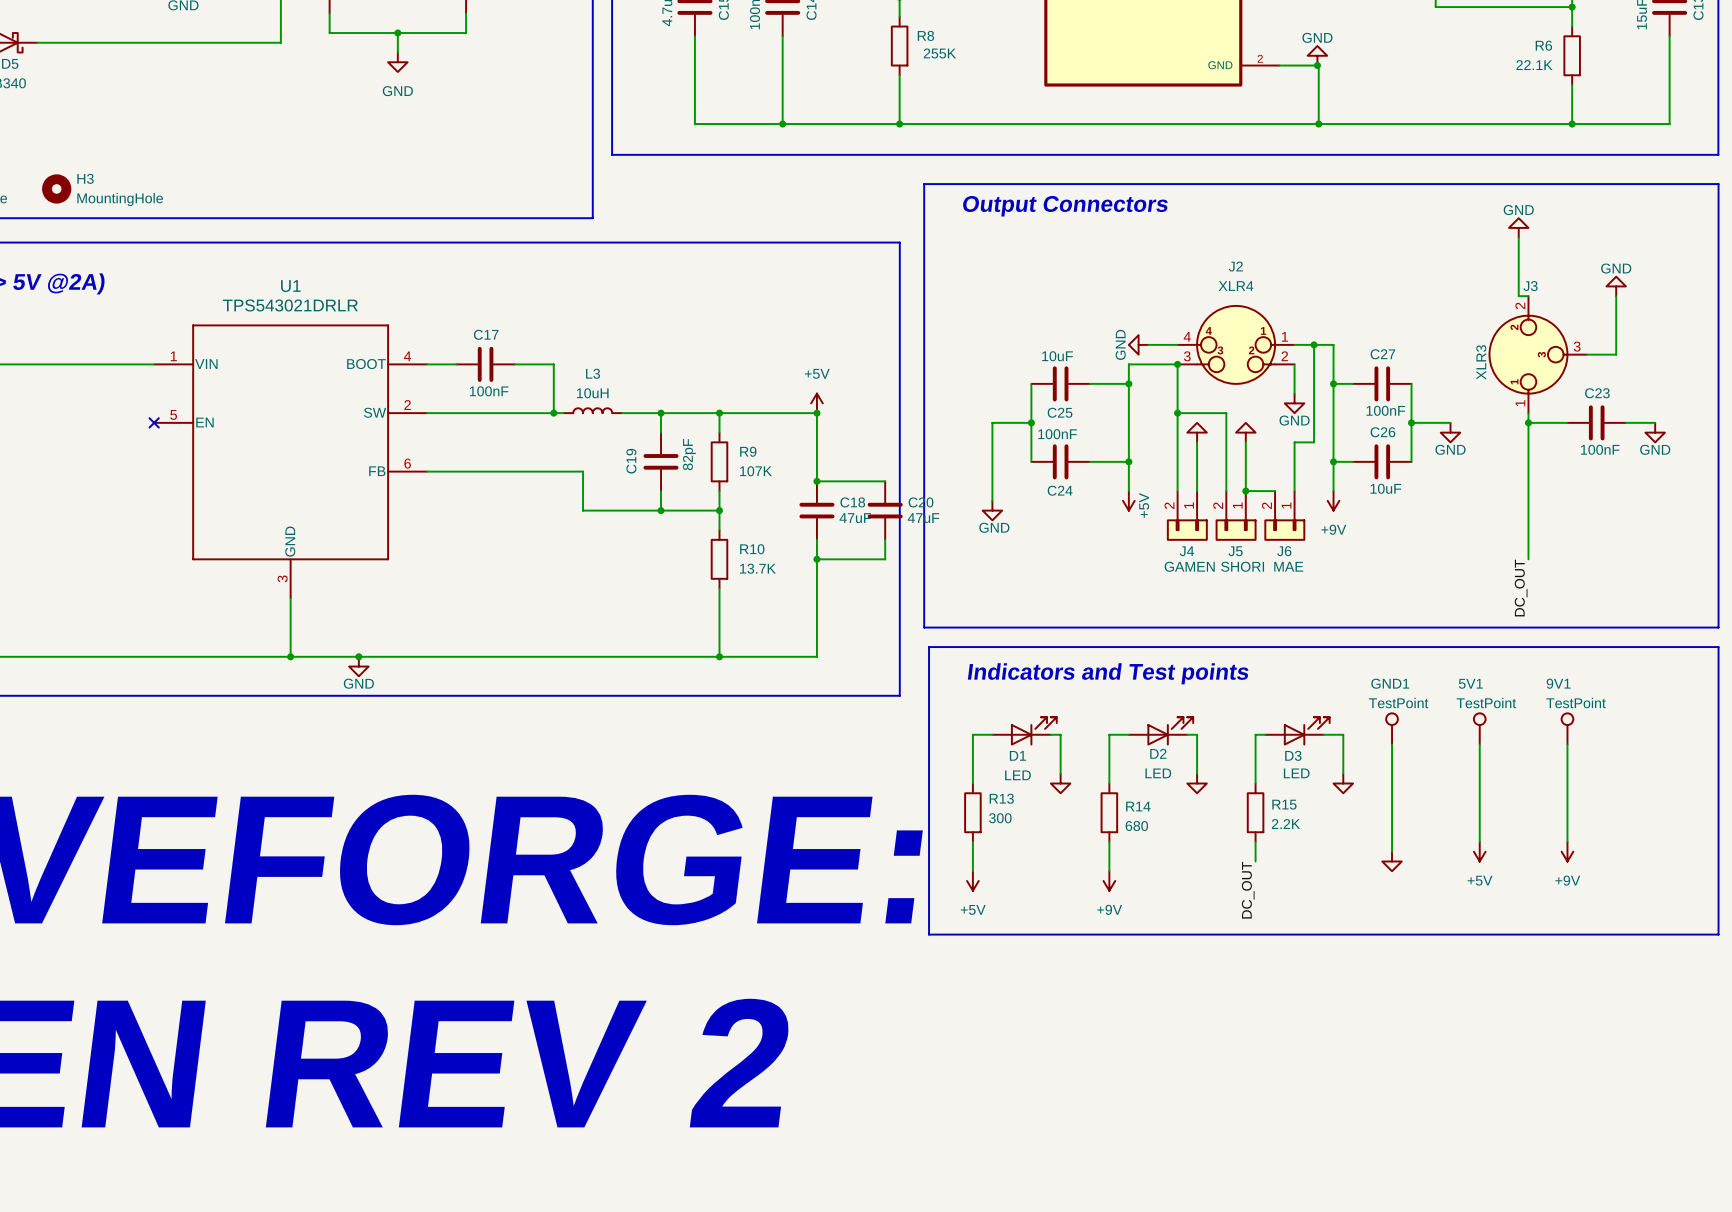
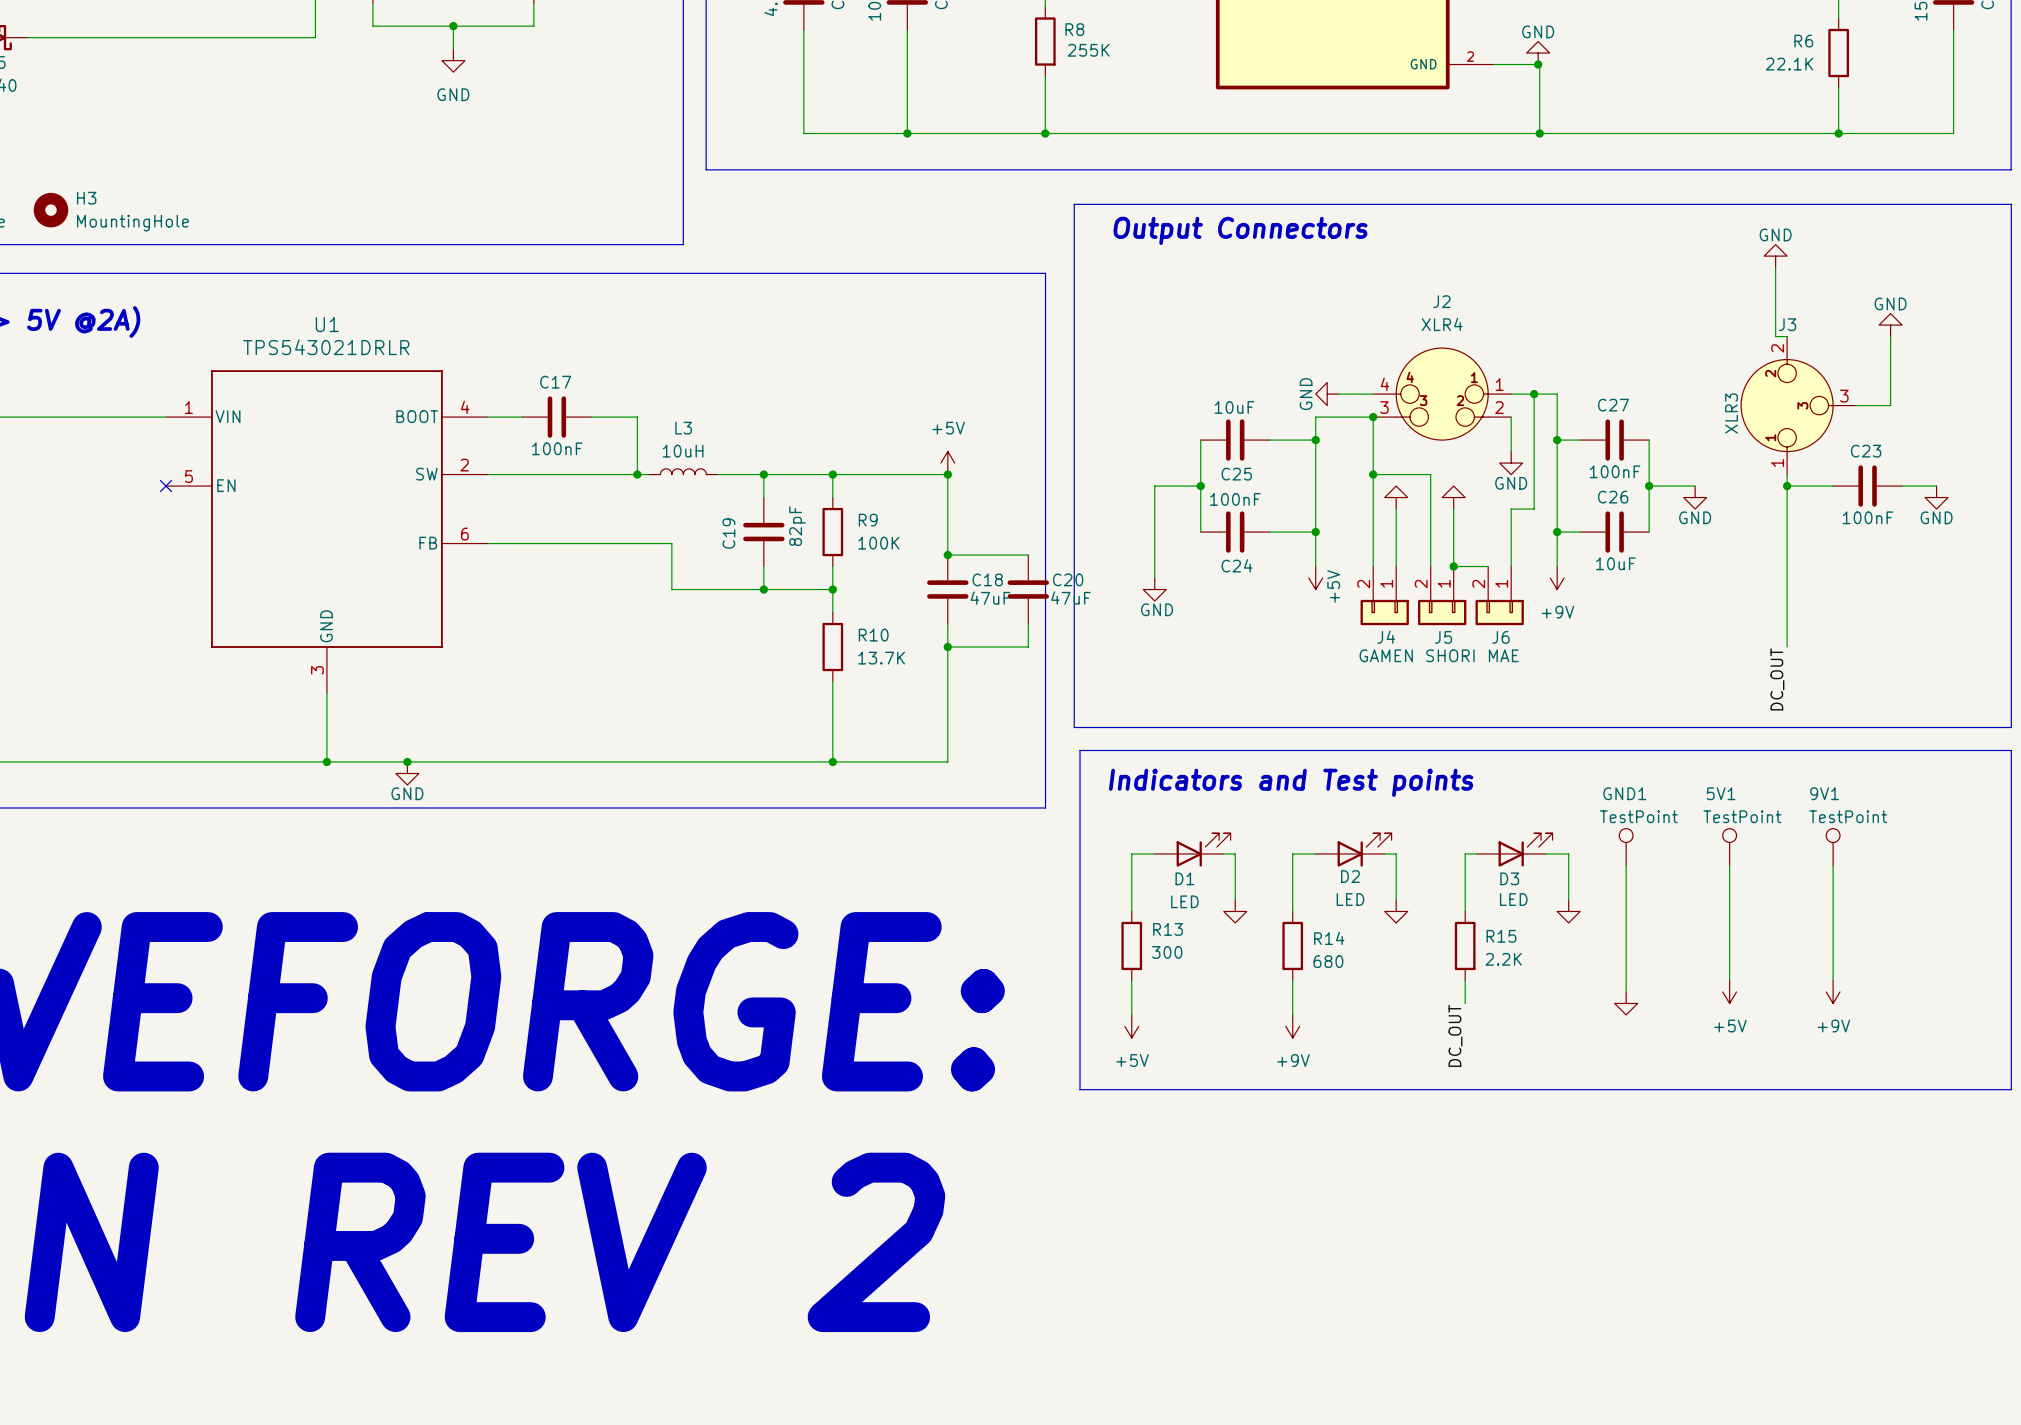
R9 value: 107K (755, 471) -> 100K (878, 543)

